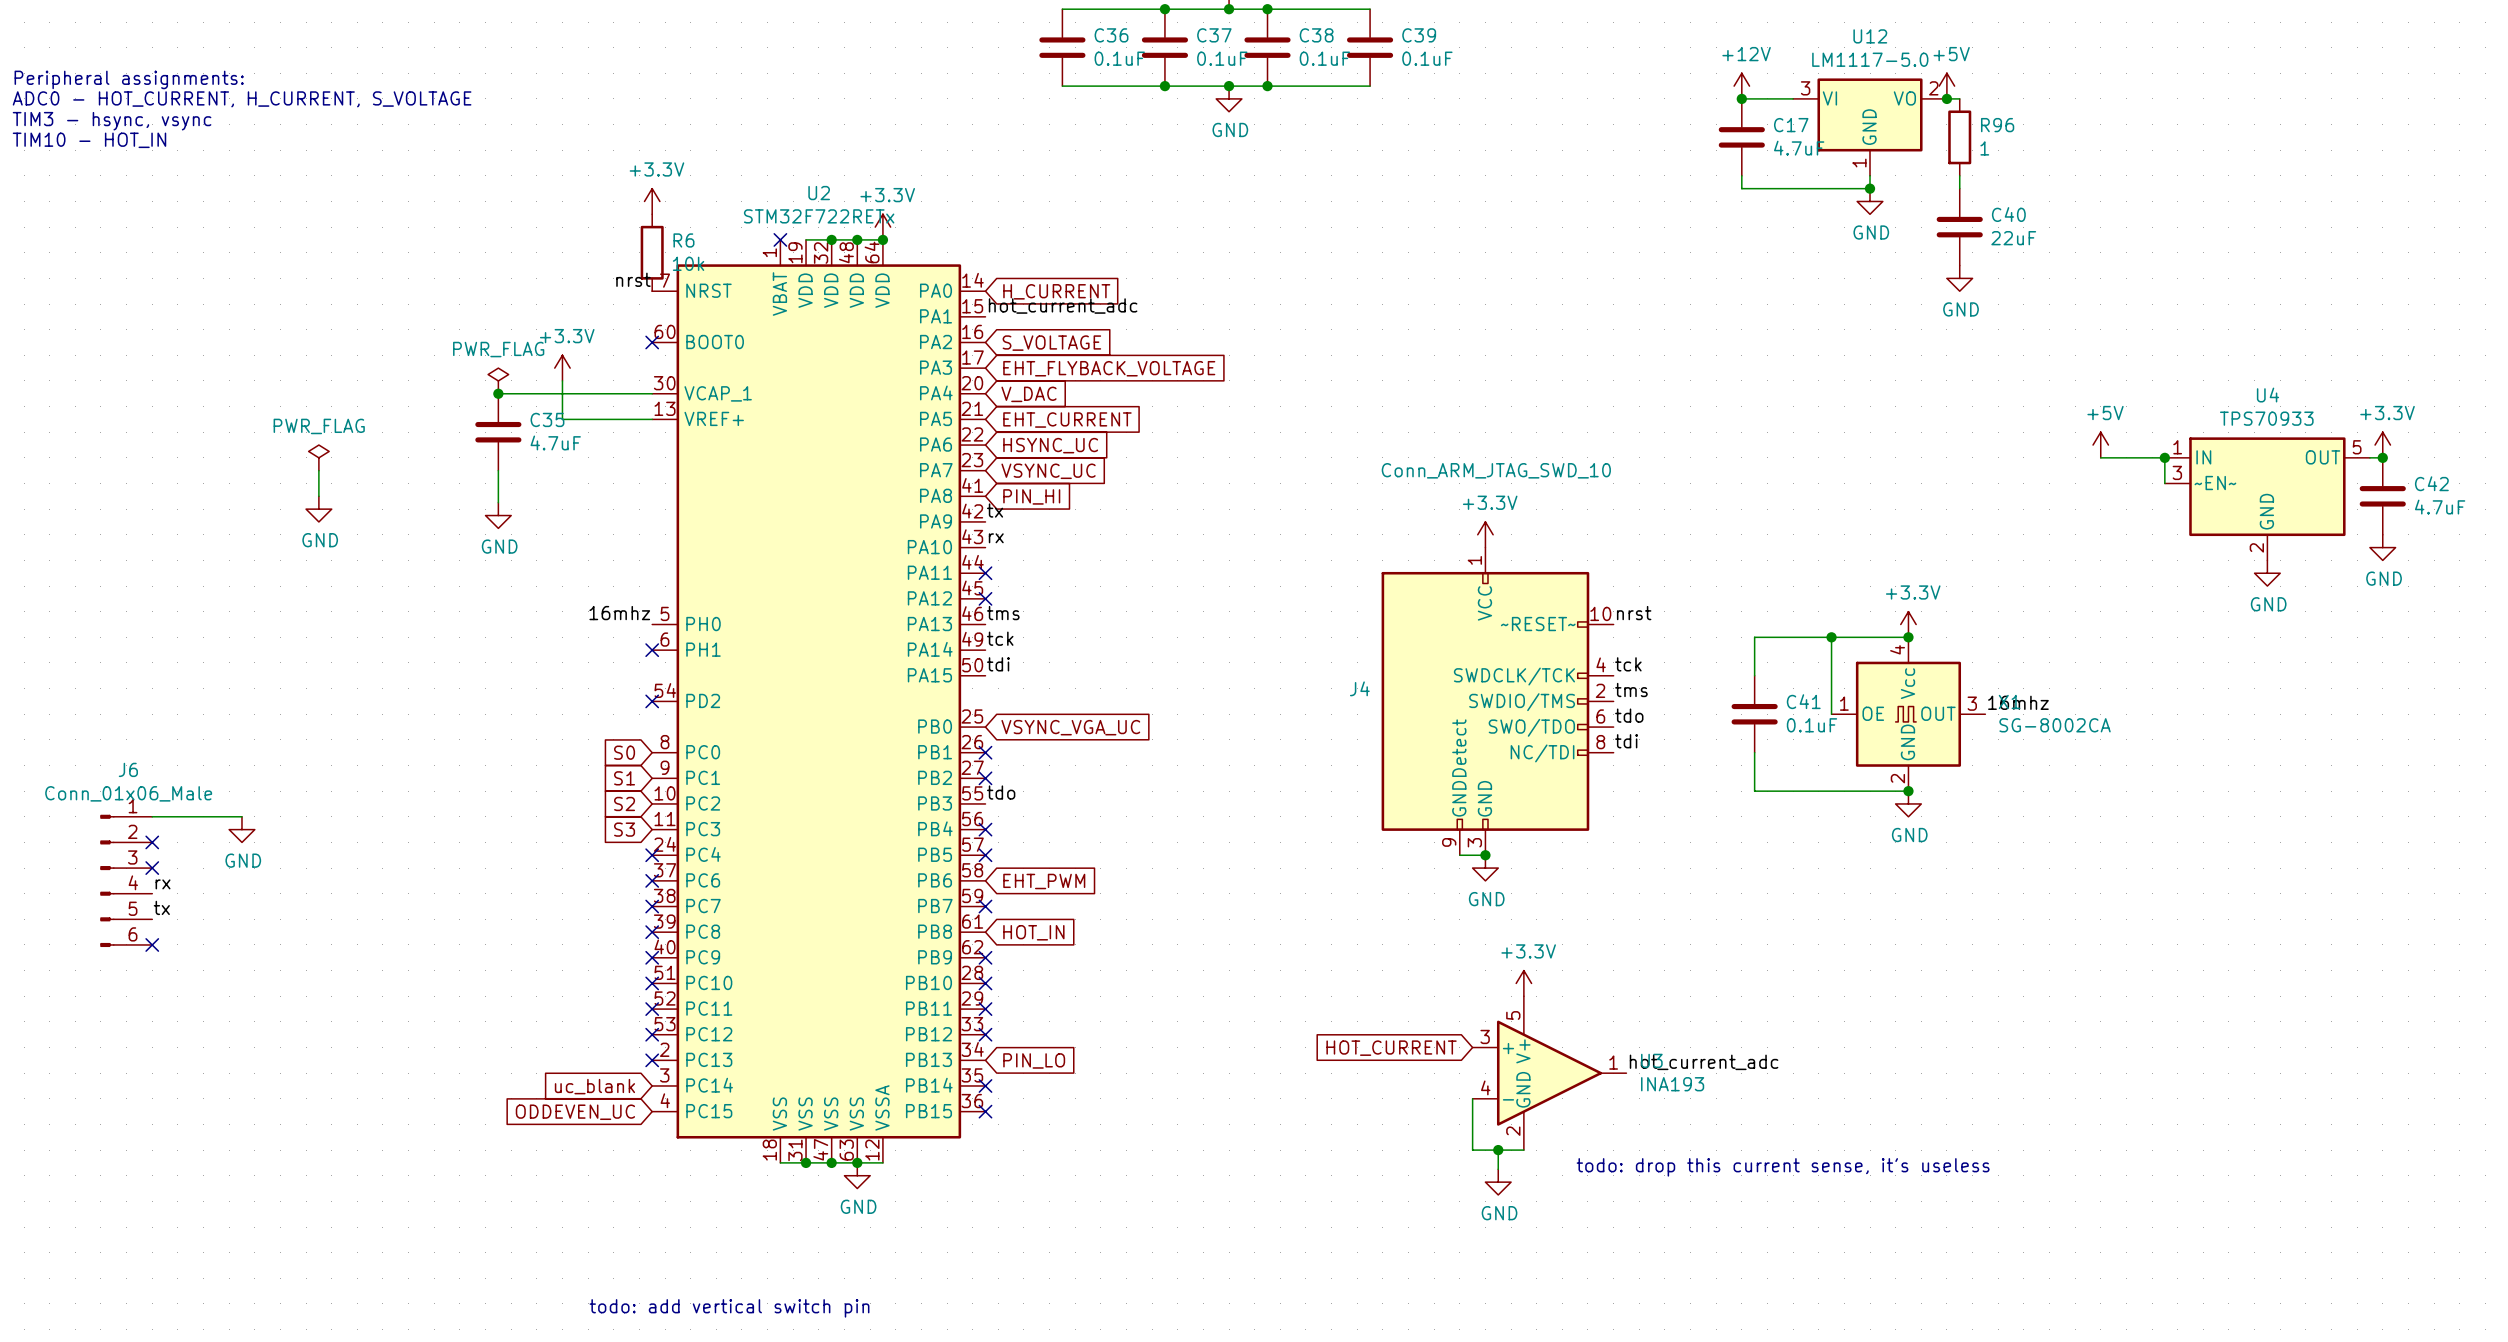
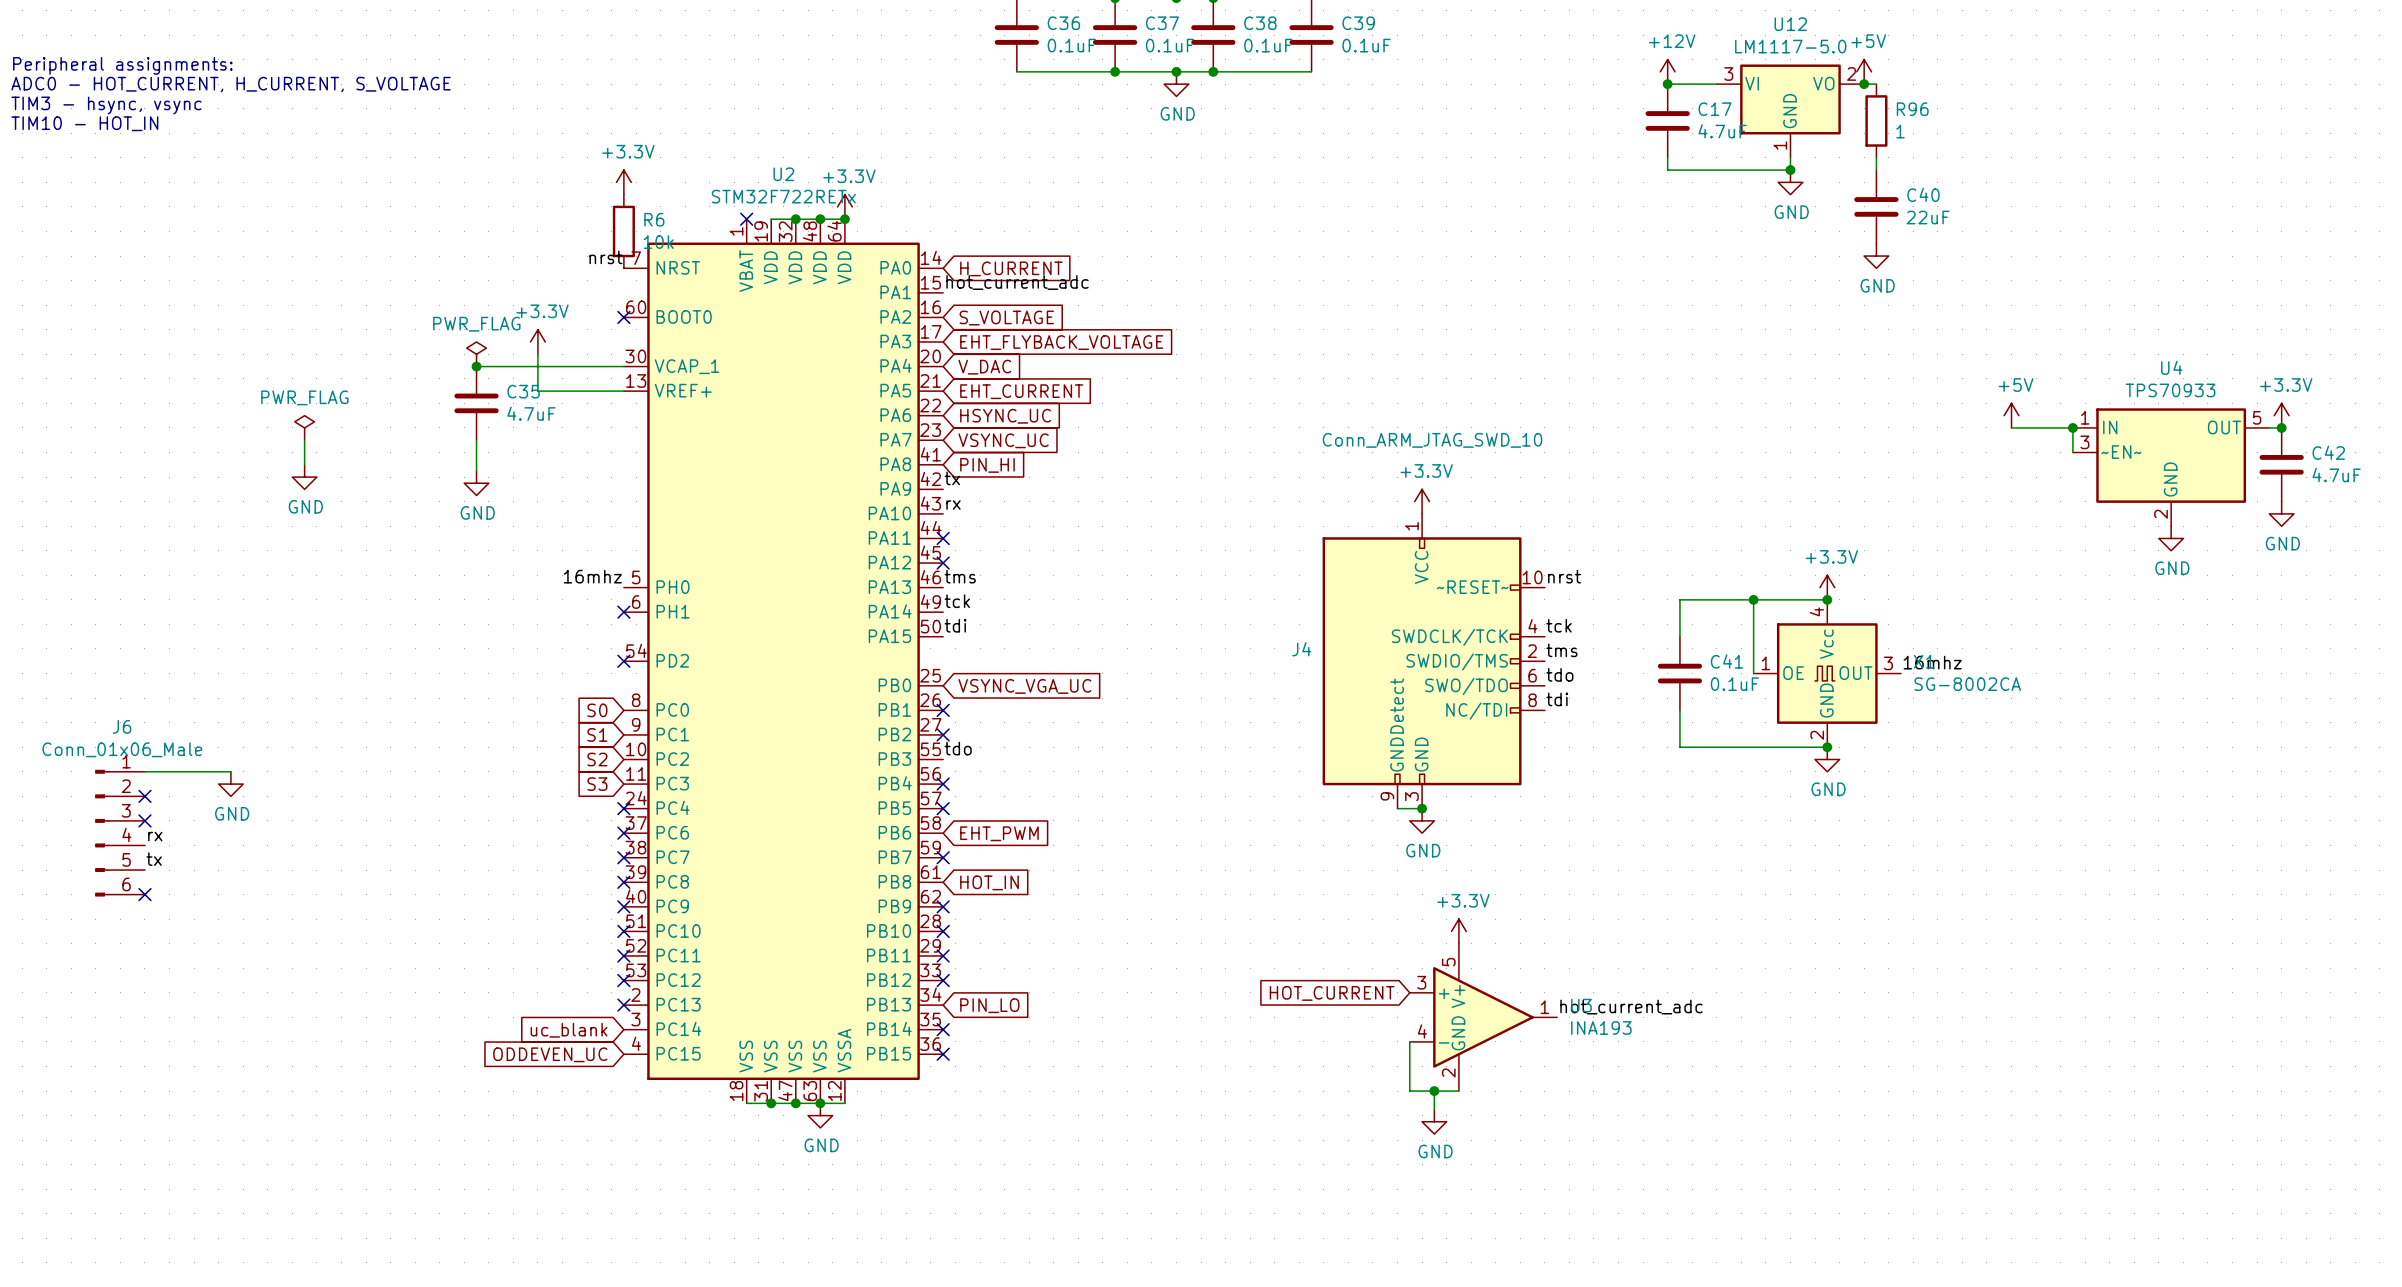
text: todo: drop this current sense, it's useless (1783, 1167) -> none
text: todo: add vertical switch pin (729, 1308) -> none

